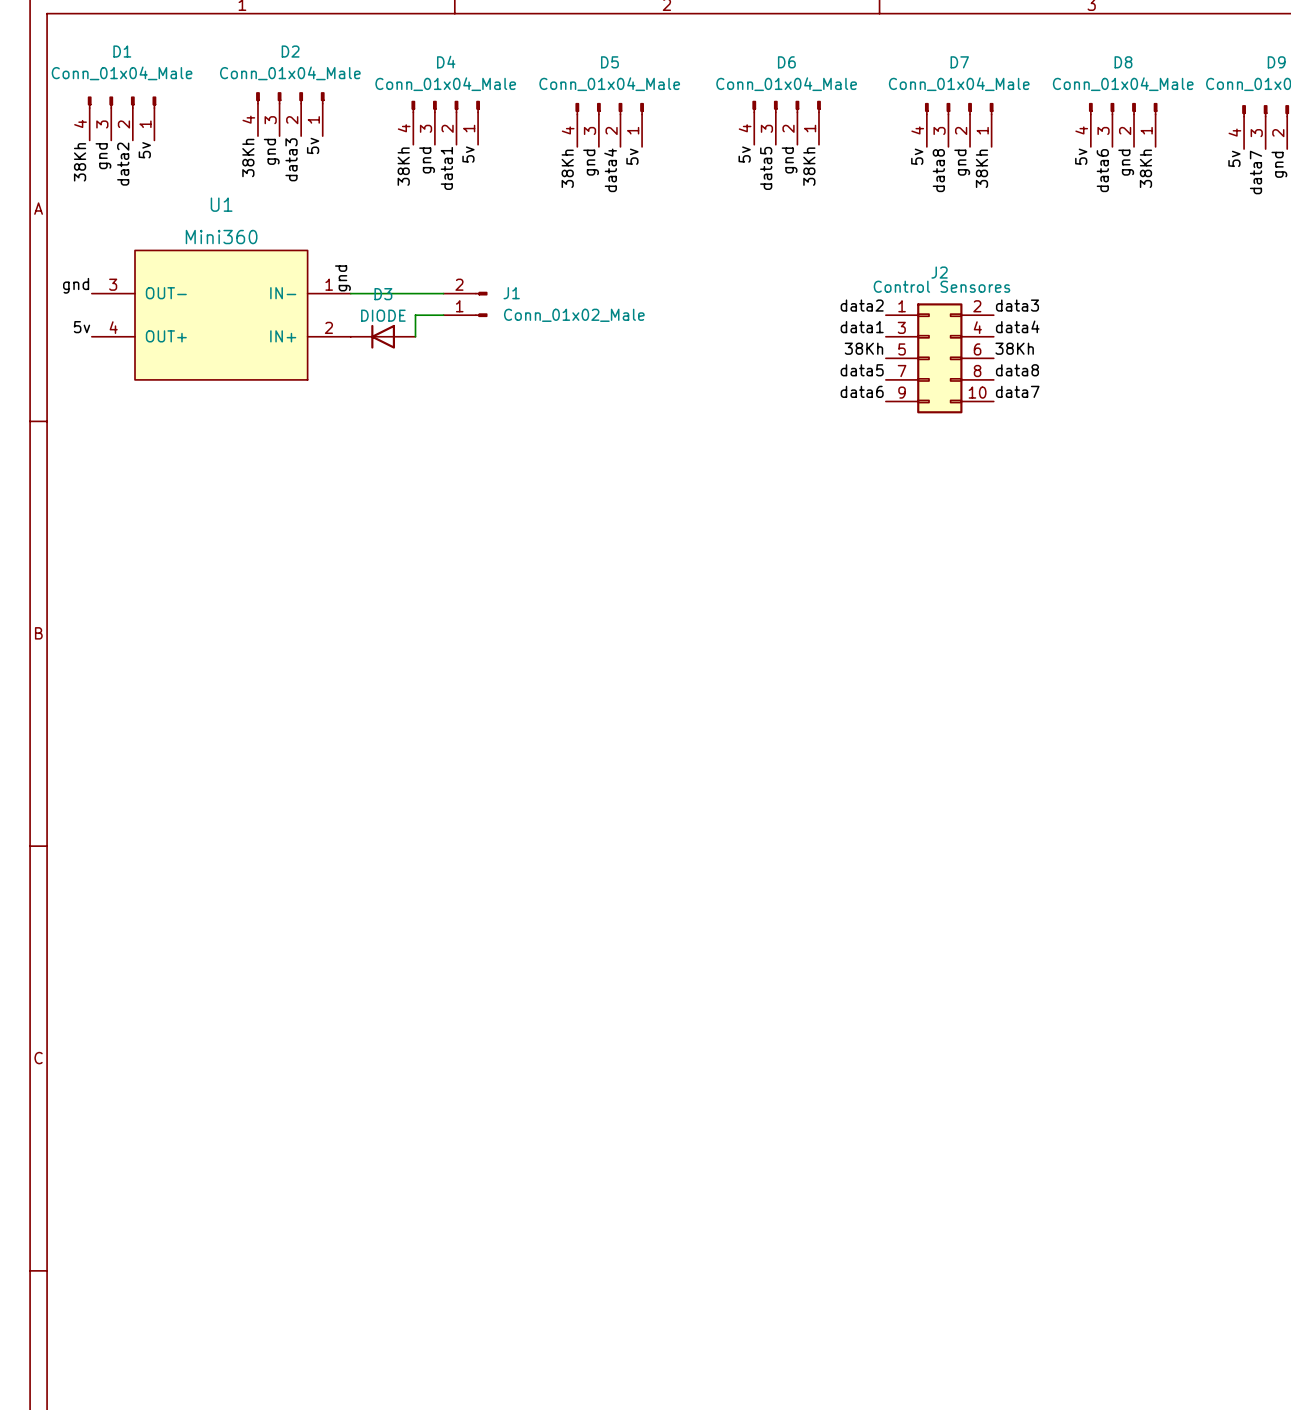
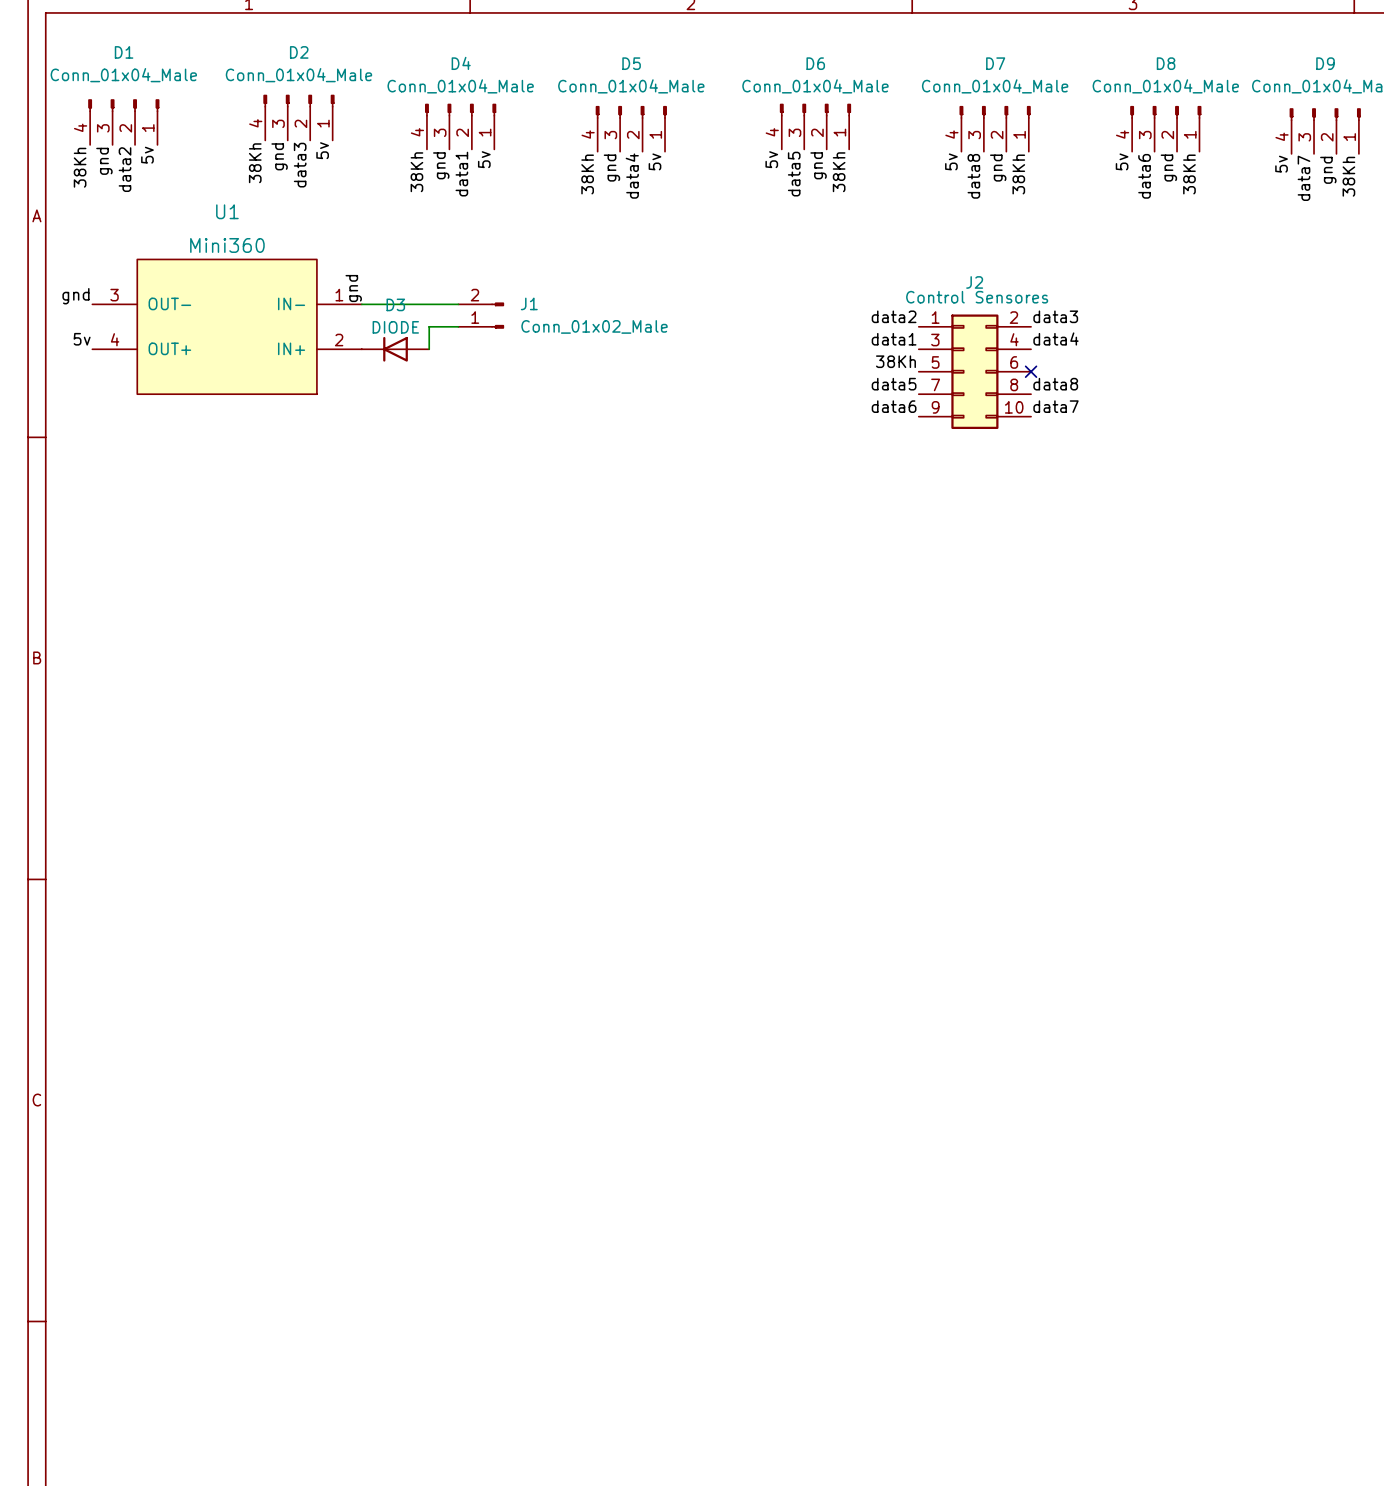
label: 38Kh (1014, 348) -> none
no-connect mark: none -> (1031, 371)

